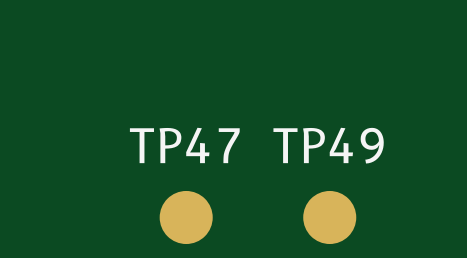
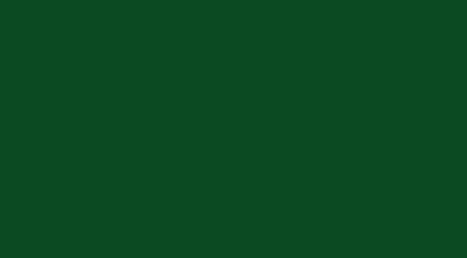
TP47: (186, 217) -> none
TP49: (329, 217) -> none

